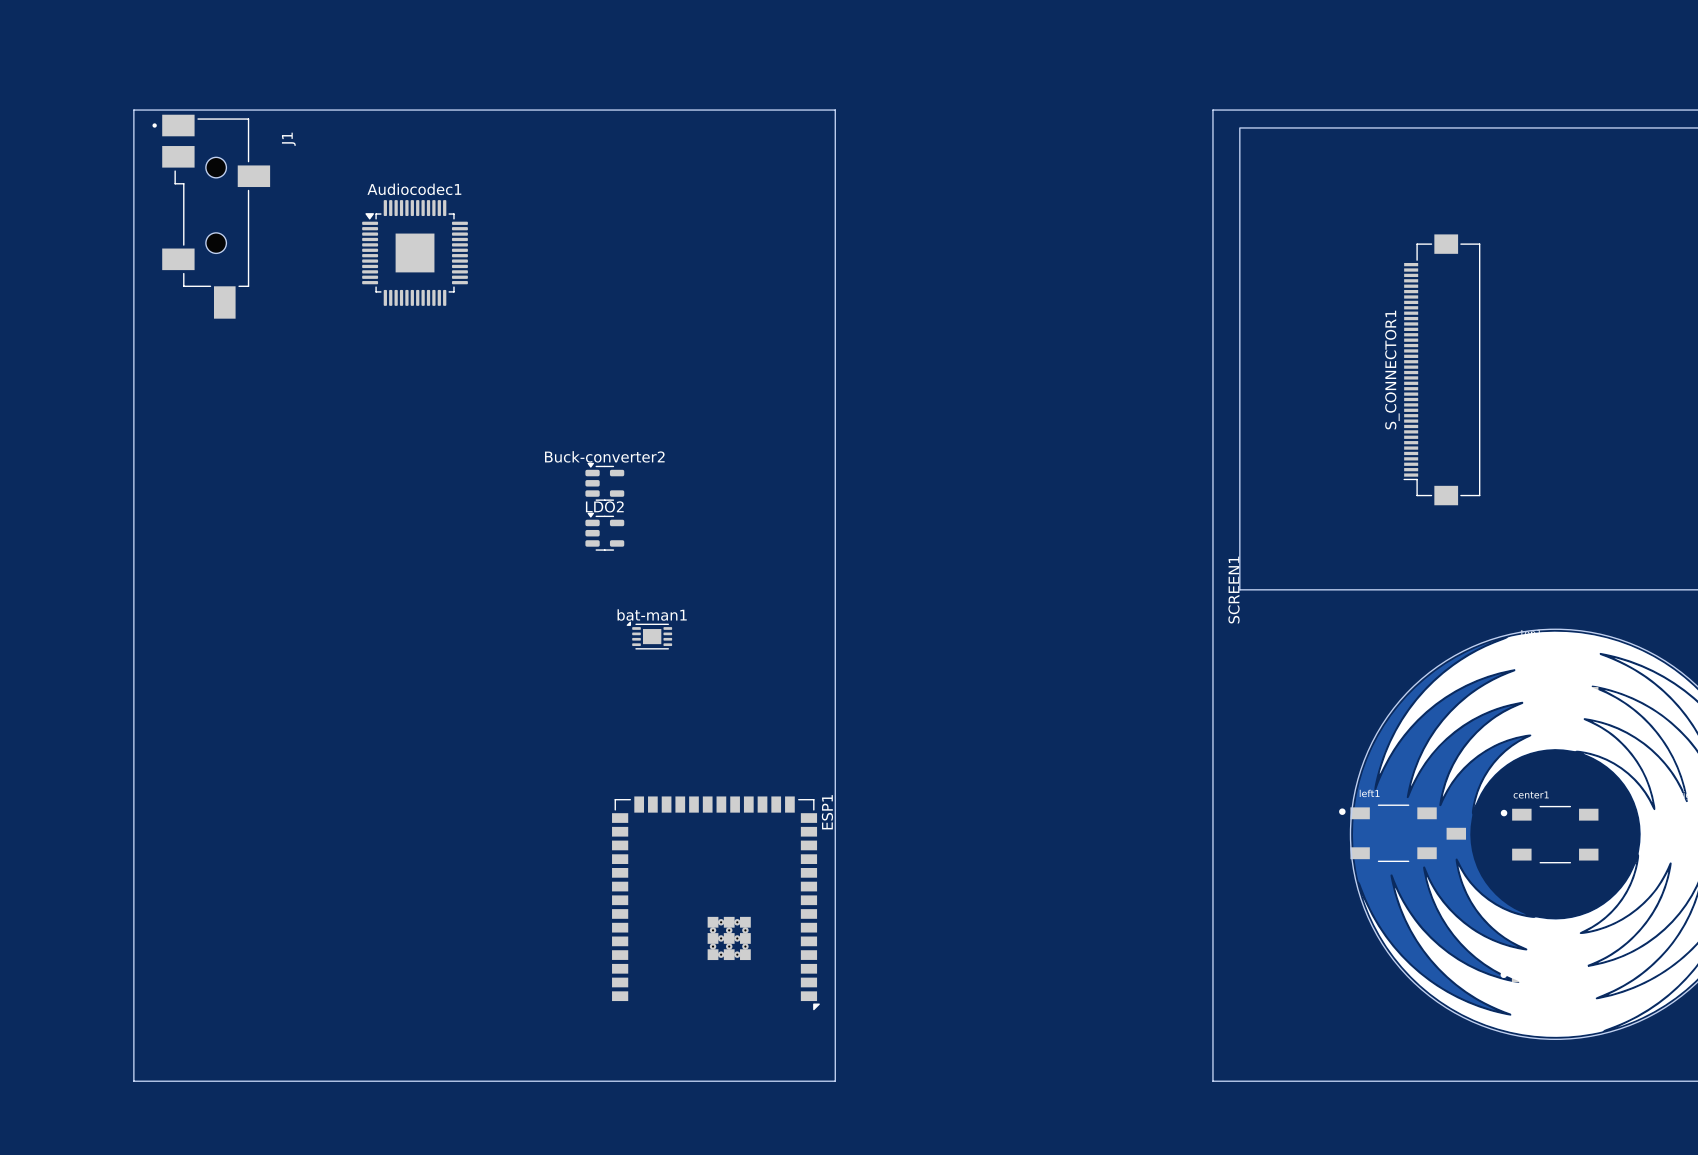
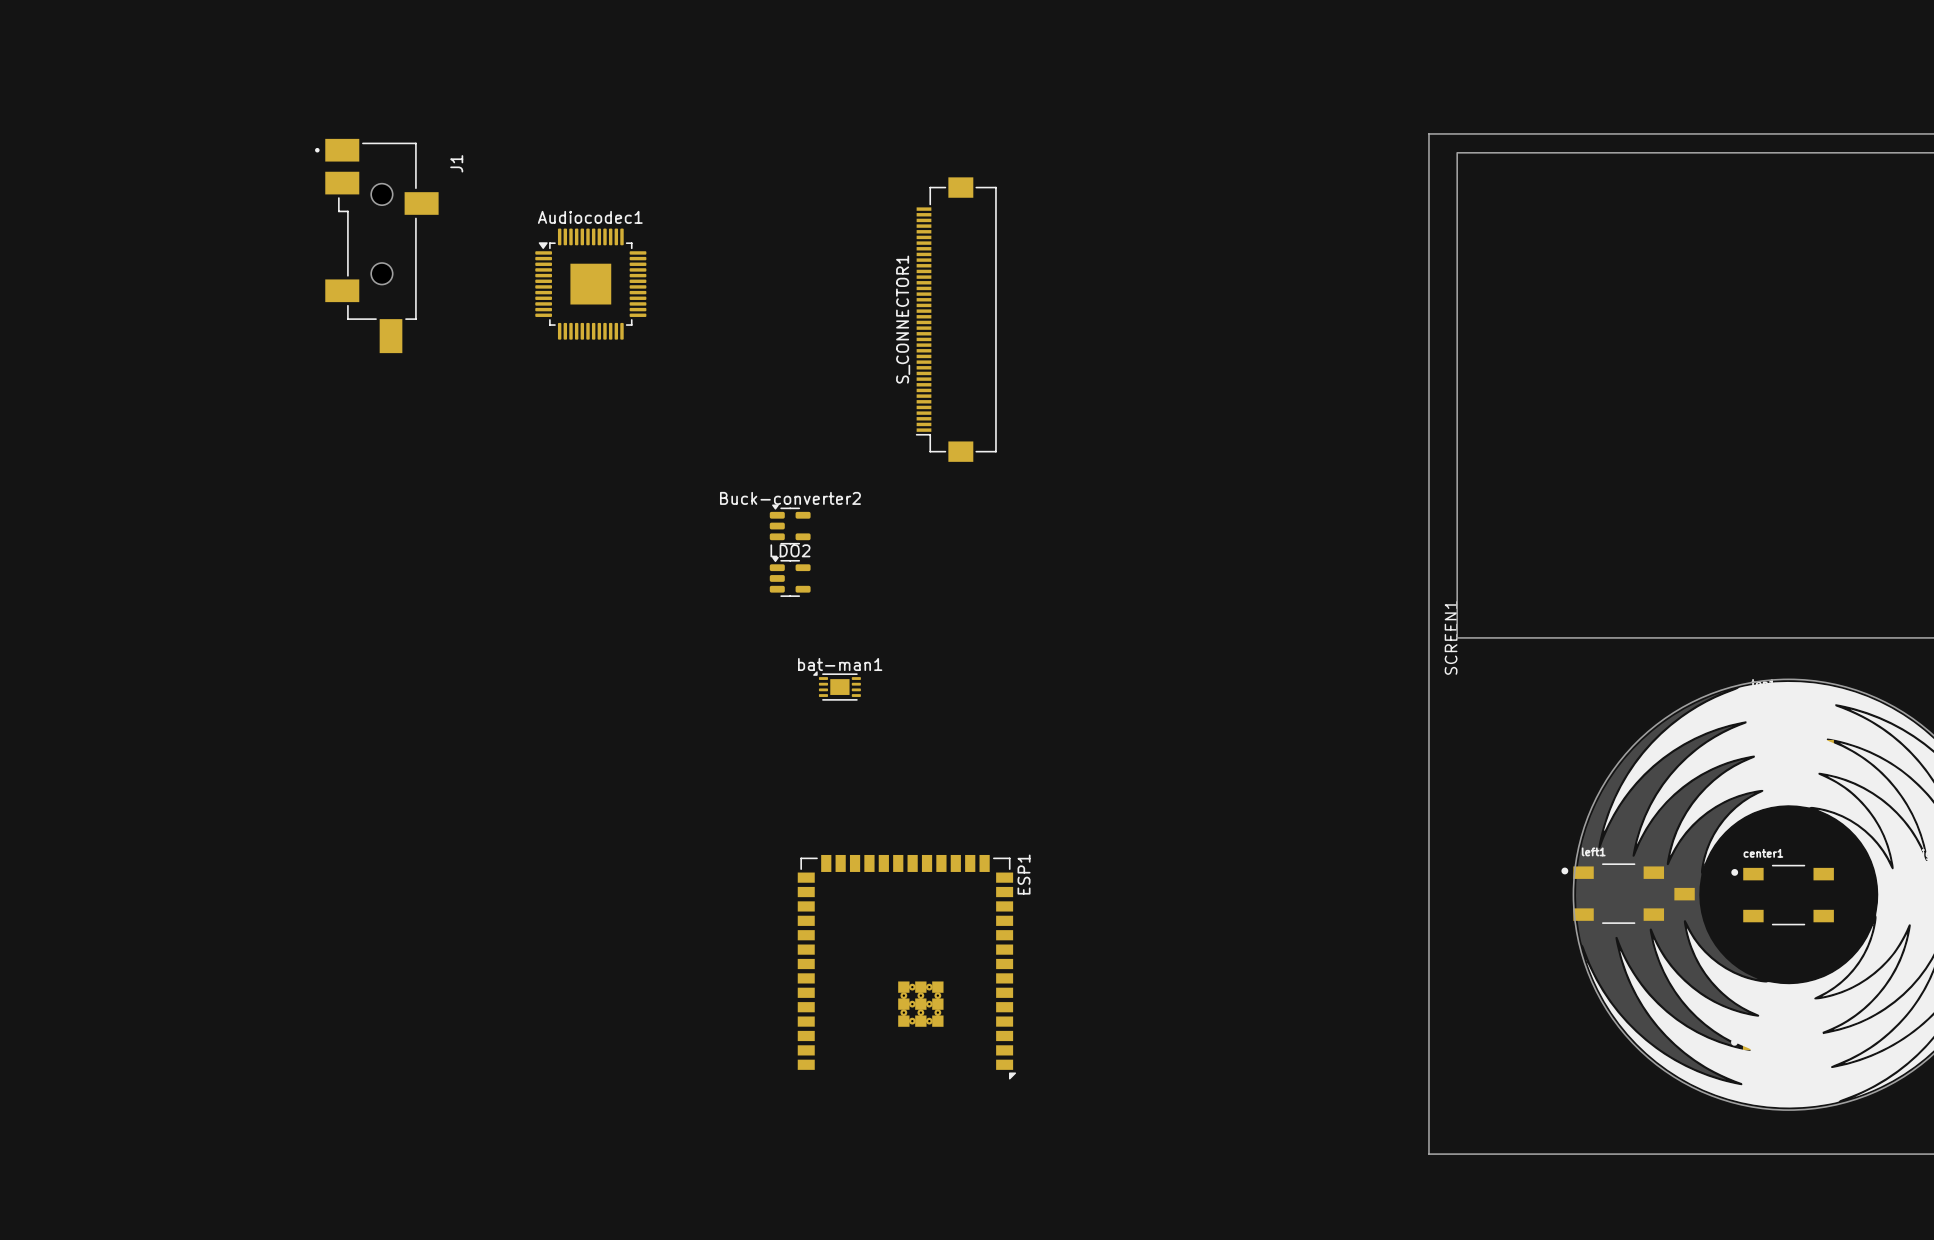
board edge: (133, 110) (835, 110) (835, 1081) (133, 1081) (133, 110) -> none
S_CONNECTOR1 position: (1441, 369) -> (956, 319)

